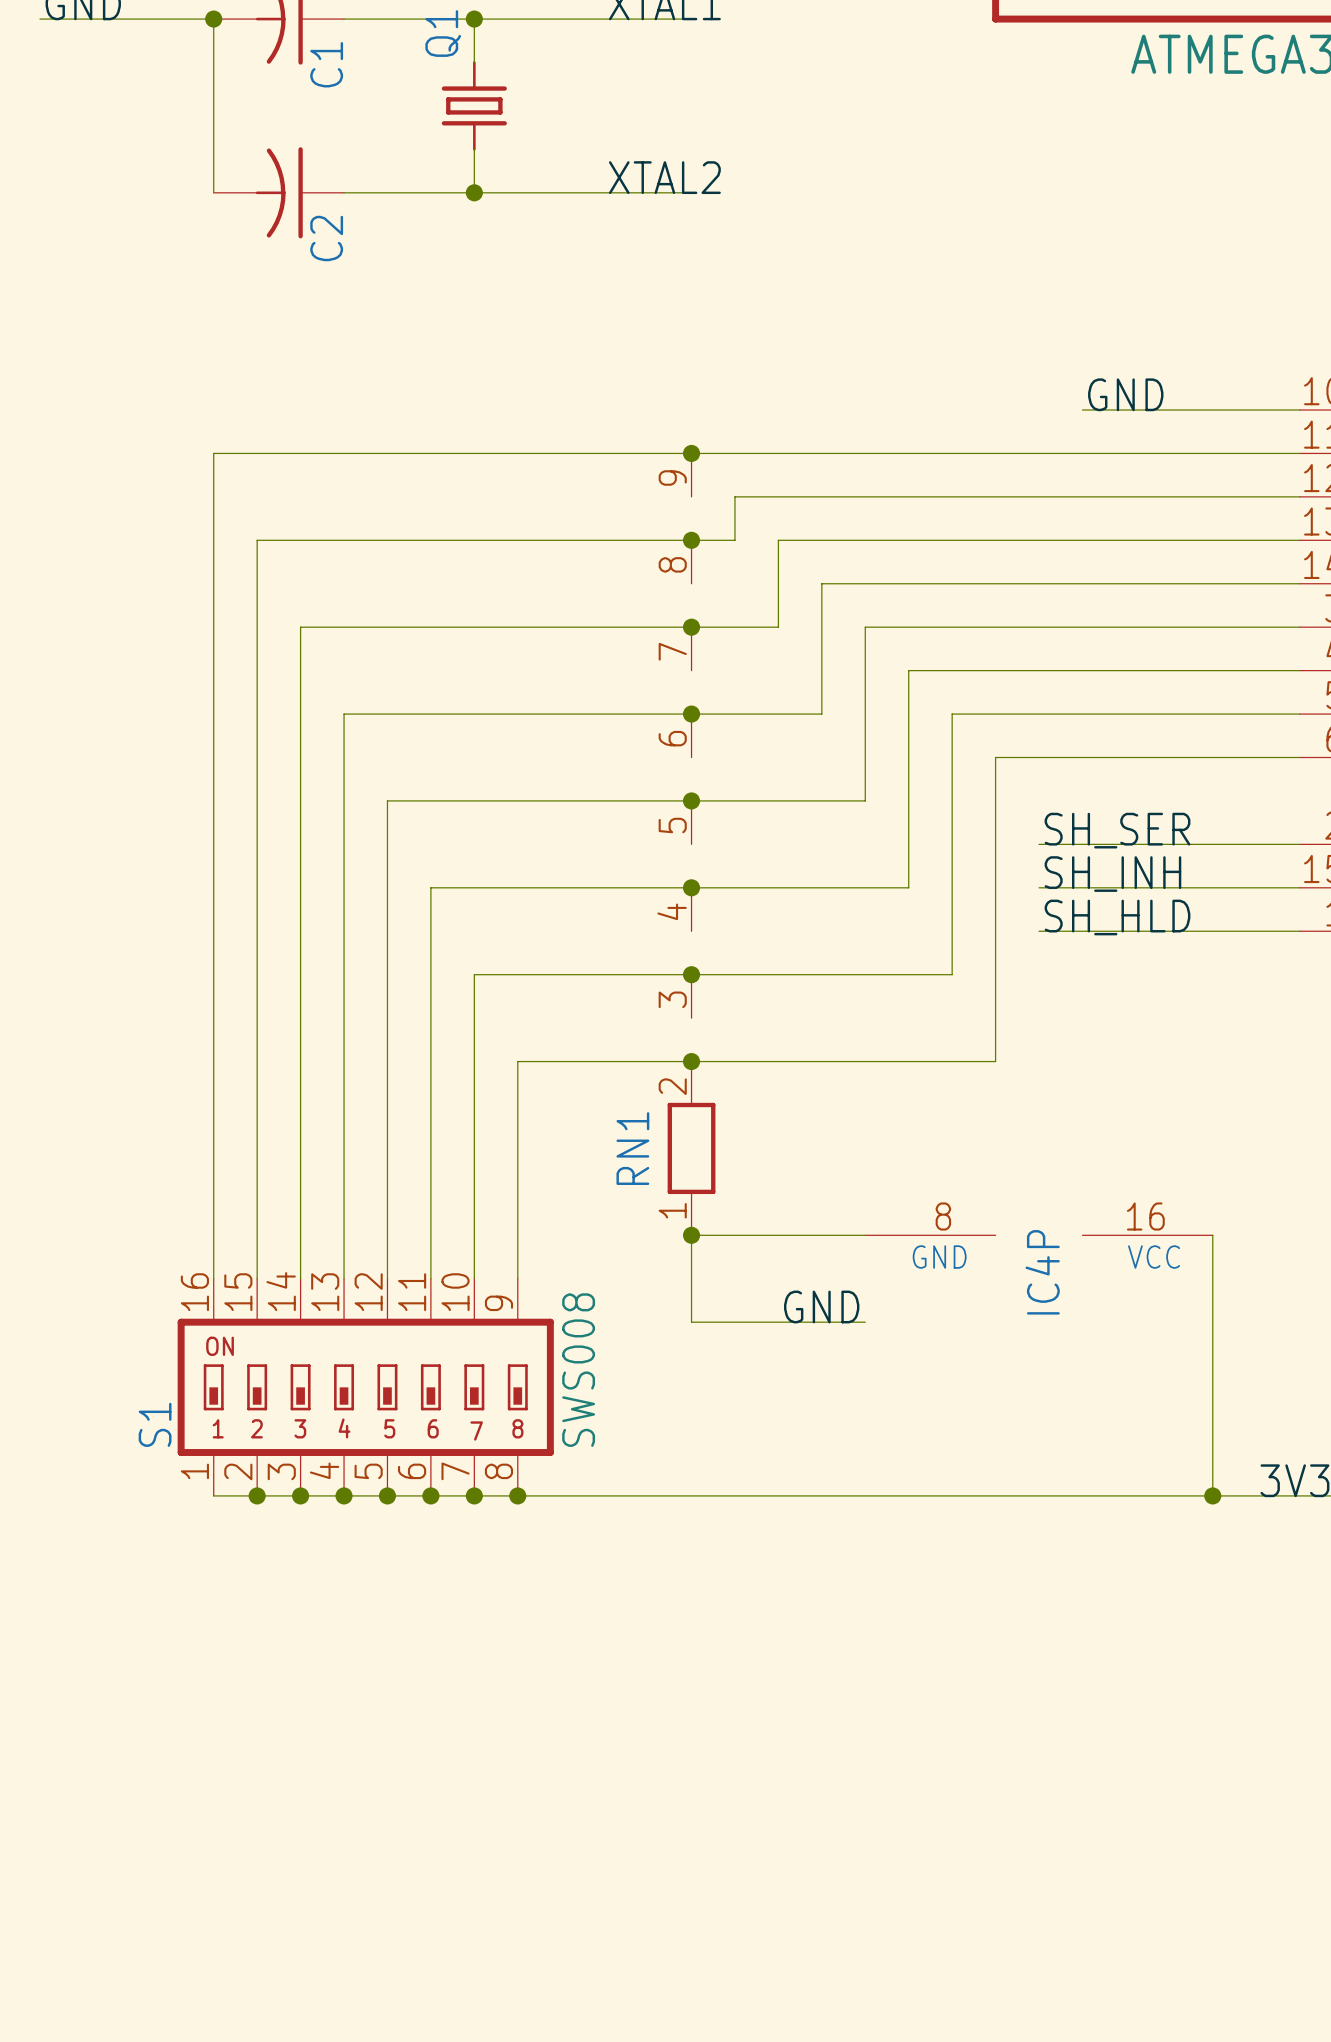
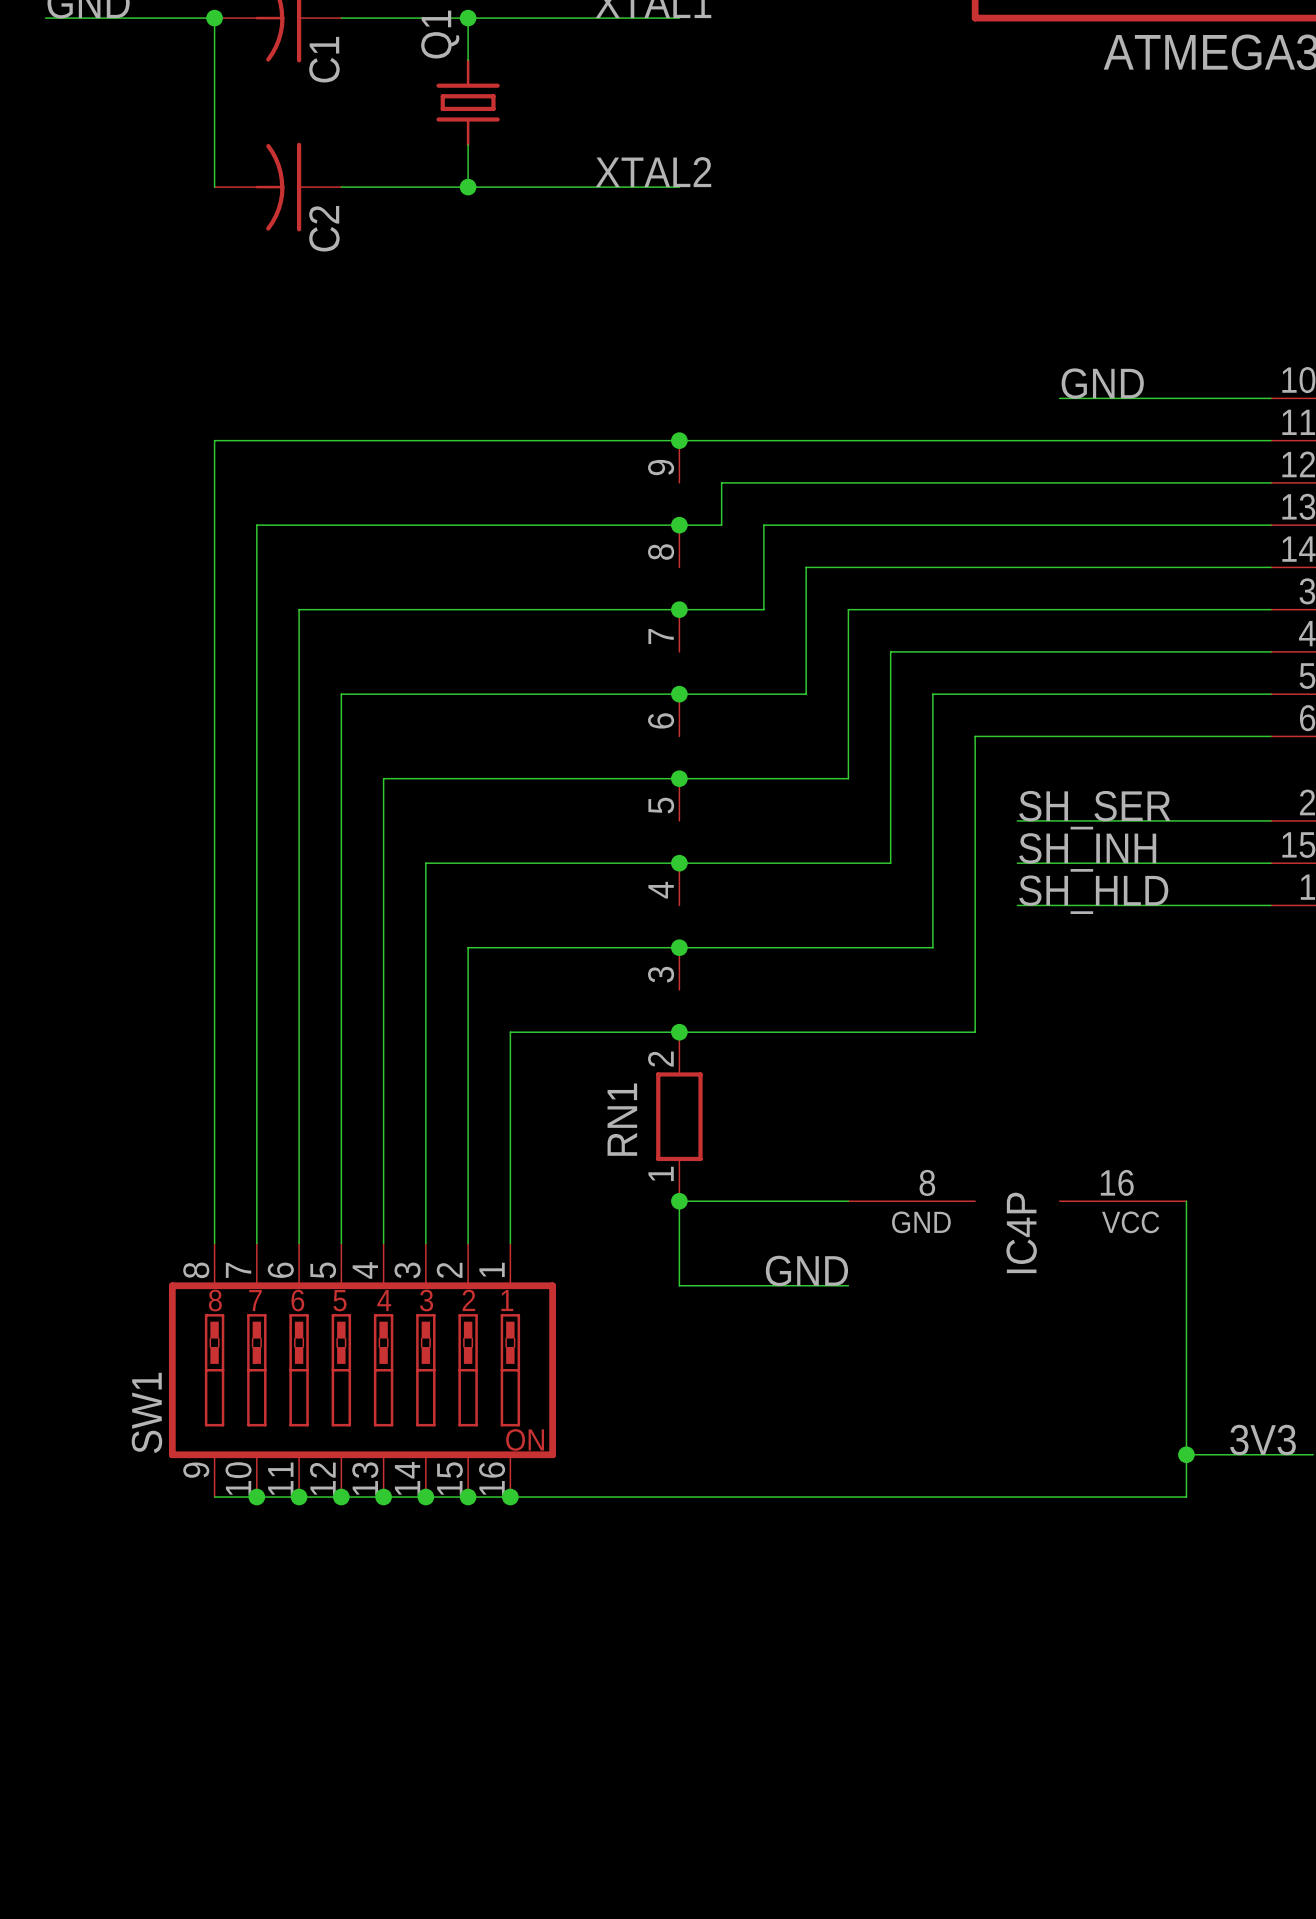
S1: SWS008 (365, 1387) -> none
SW1: none -> (362, 1370)
wire: (213, 1495) (1212, 1495) -> (214, 1497) (1186, 1497) (1186, 1454)
junction: (257, 1495) -> none
junction: (300, 1495) -> none
junction: (344, 1495) -> none
junction: (387, 1495) -> none
junction: (430, 1495) -> none
junction: (474, 1495) -> none
junction: (517, 1495) -> none
junction: none -> (256, 1497)
junction: none -> (299, 1497)
junction: none -> (341, 1497)
junction: none -> (383, 1497)
junction: none -> (425, 1497)
junction: none -> (468, 1497)
junction: none -> (510, 1497)

